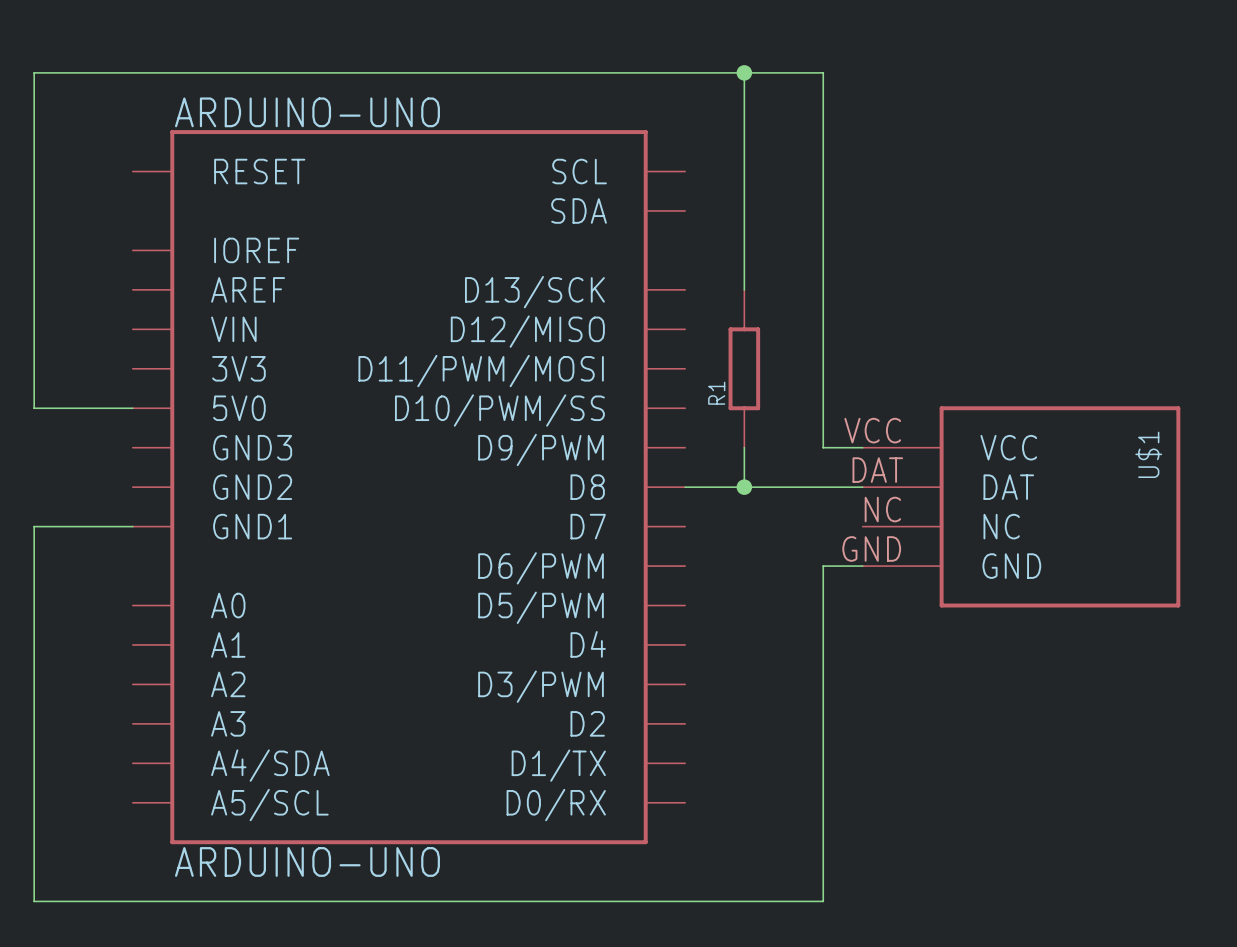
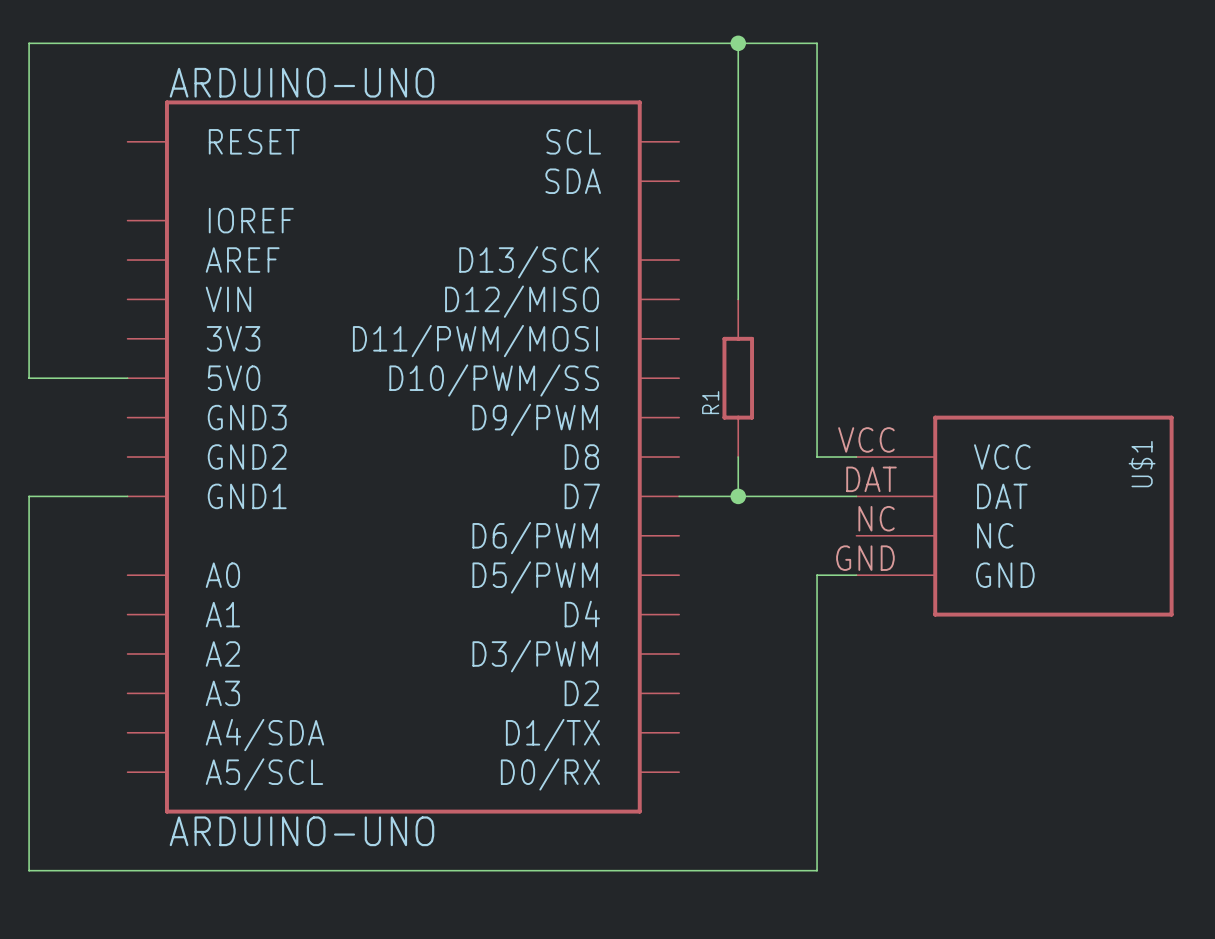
wire: none -> (738, 43) (738, 82)
wire: (34, 72) (823, 72) -> (29, 82) (29, 43) (817, 43) (817, 82)
junction position: (744, 72) -> (738, 43)
wire: (34, 368) (34, 408) (132, 408) -> (29, 378) (127, 378)
ARDUINO-UNO position: (408, 487) -> (403, 457)
wire: (34, 526) (132, 526) -> (29, 535) (29, 496) (127, 496)
wire: (34, 861) (34, 901) (823, 901) (823, 861) -> (29, 870) (817, 870)

